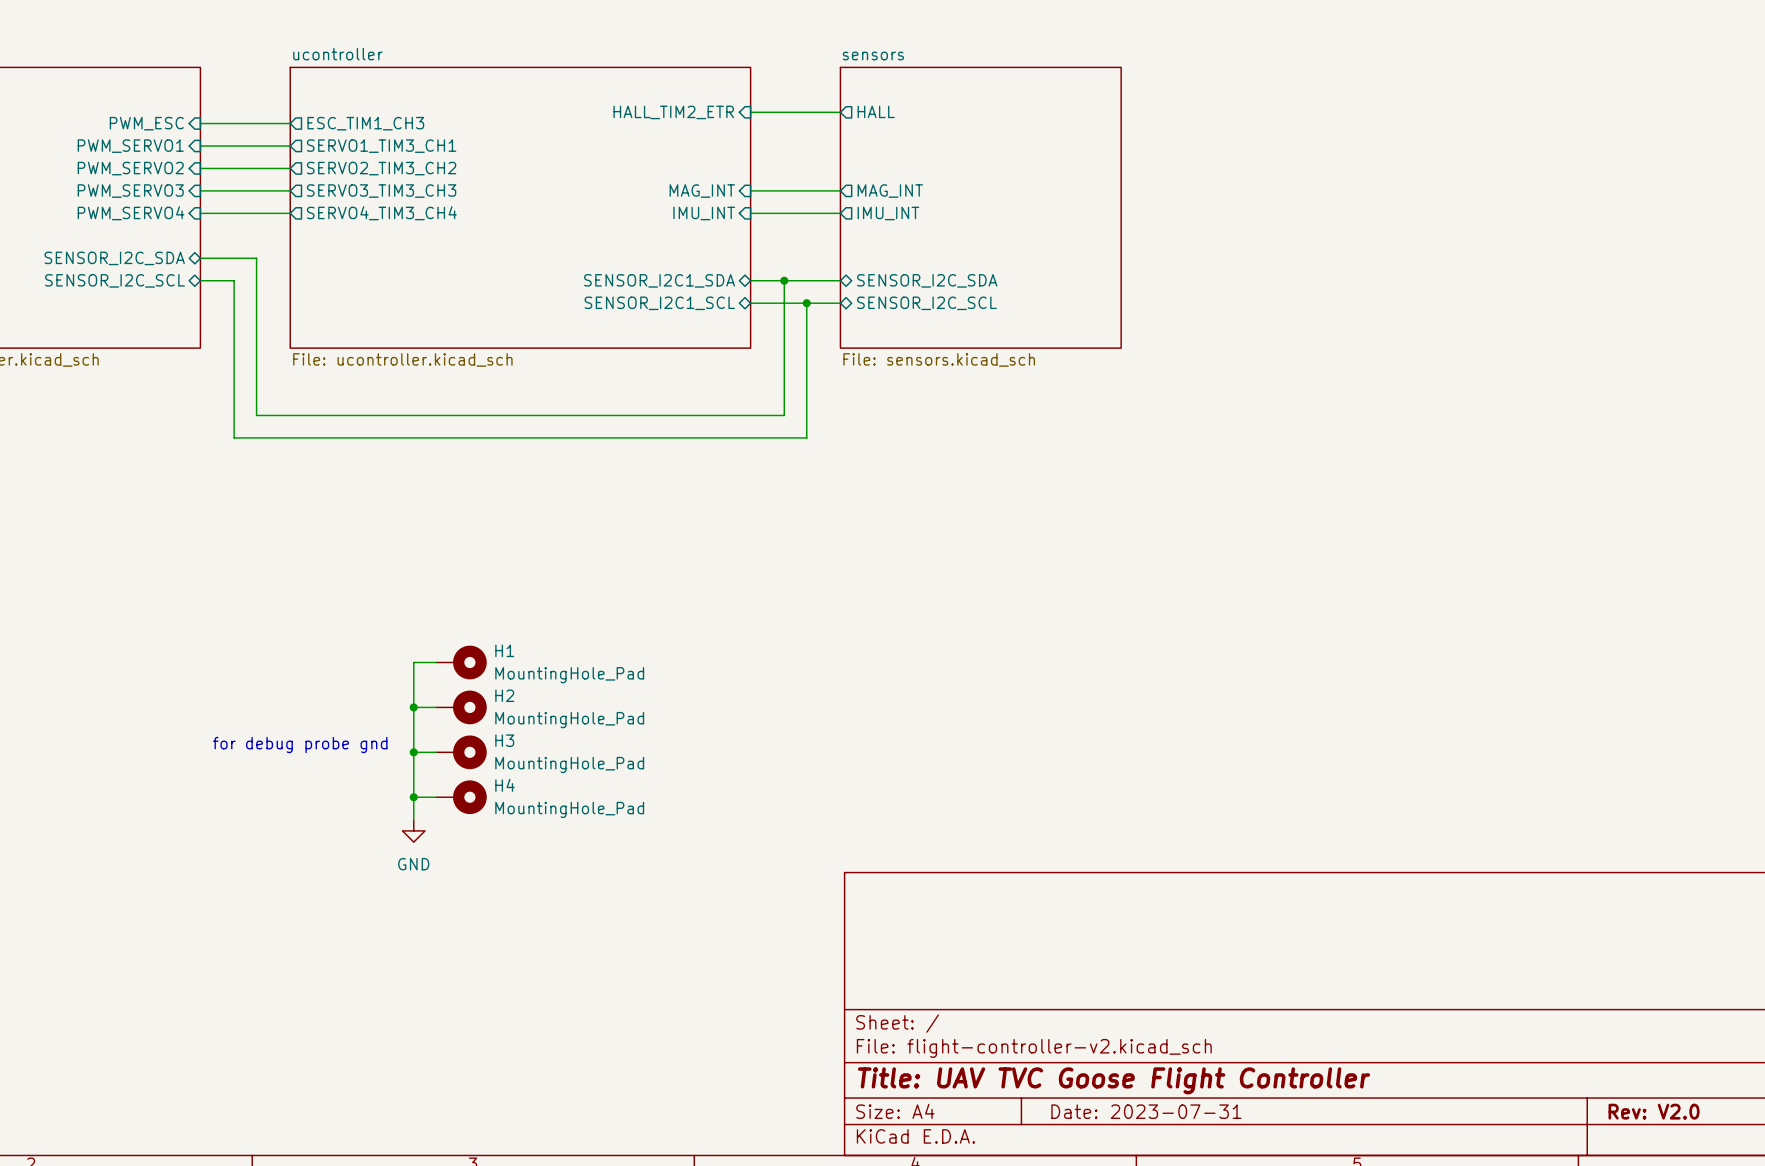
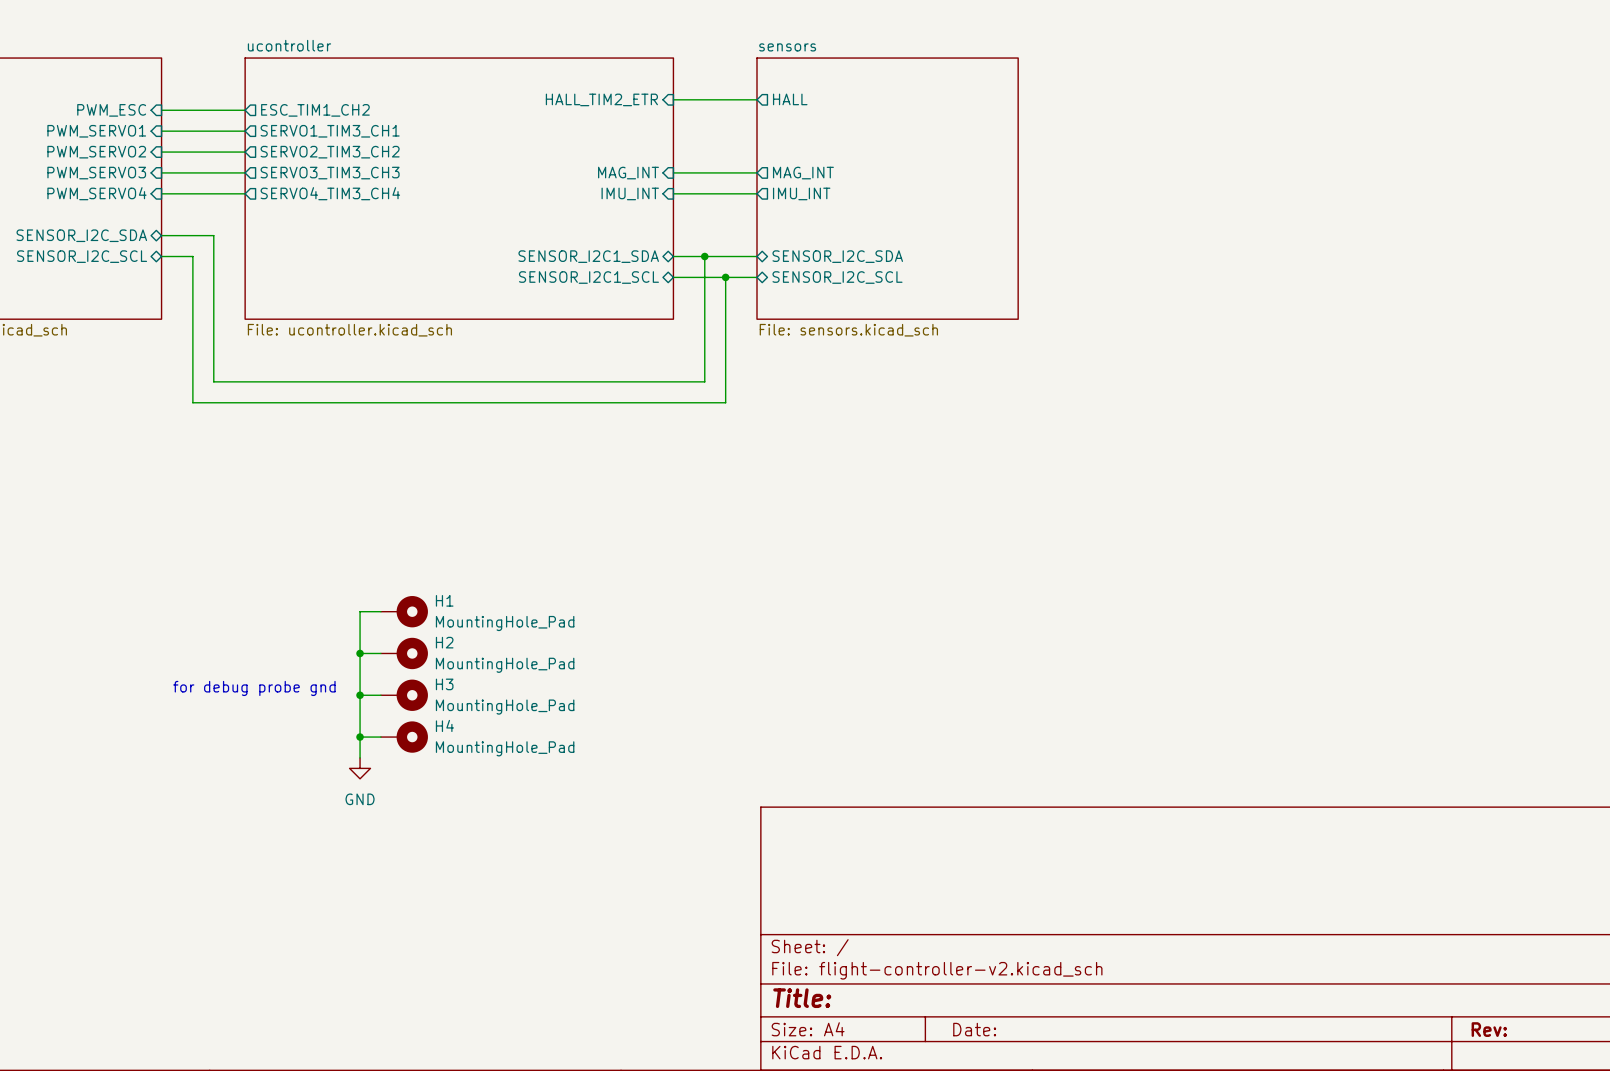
sheet pin: ESC_TIM1_CH3 (365, 123) -> ESC_TIM1_CH2 (315, 110)
title block: Title: UAV TVC Goose Flight Controller (1113, 1080) -> Title: (802, 998)
title block: Date: 2023-07-31 (1146, 1111) -> Date: (974, 1029)
title block: Rev: V2.0 (1654, 1111) -> Rev: (1489, 1029)

